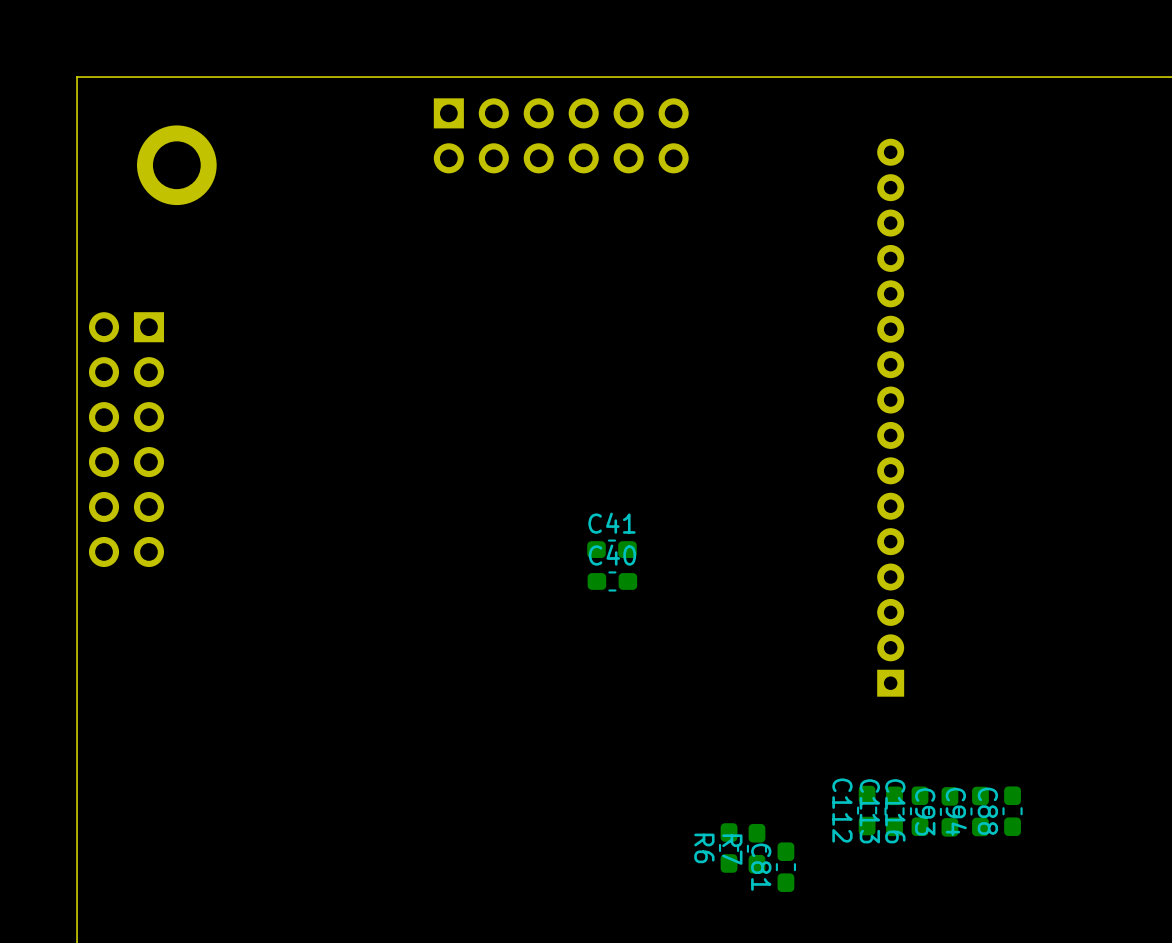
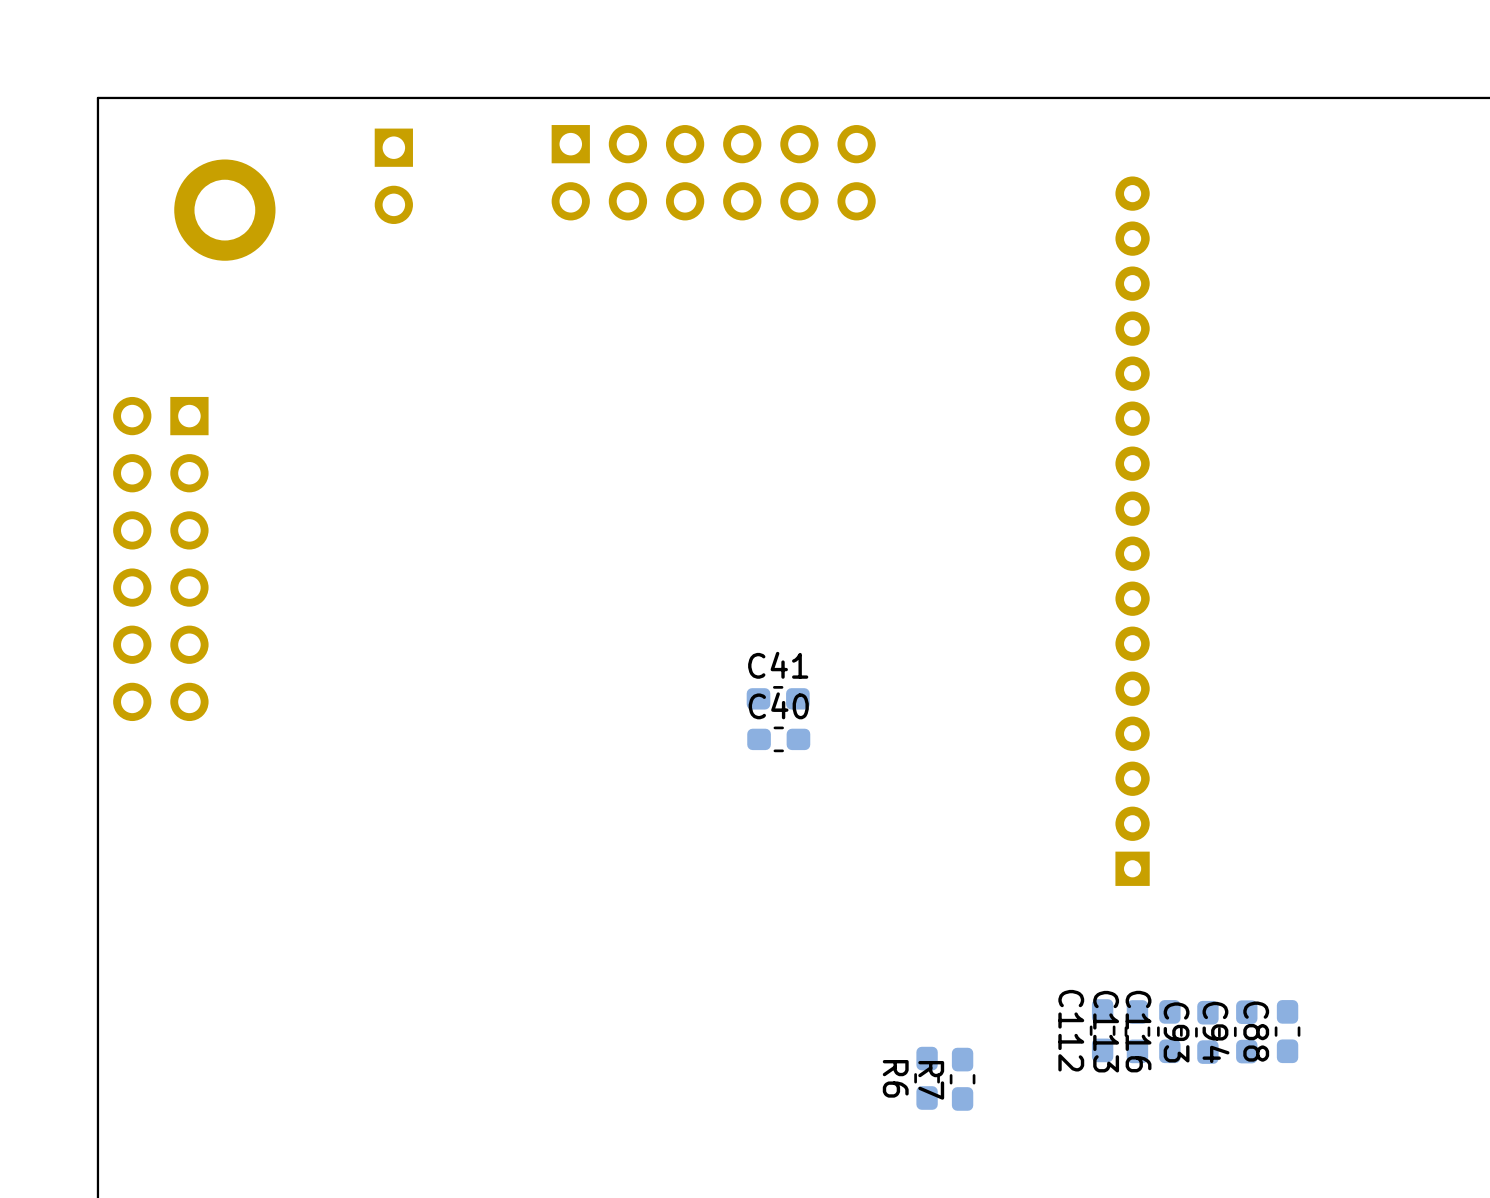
part: none -> (393, 176)
C81: (785, 867) -> none

